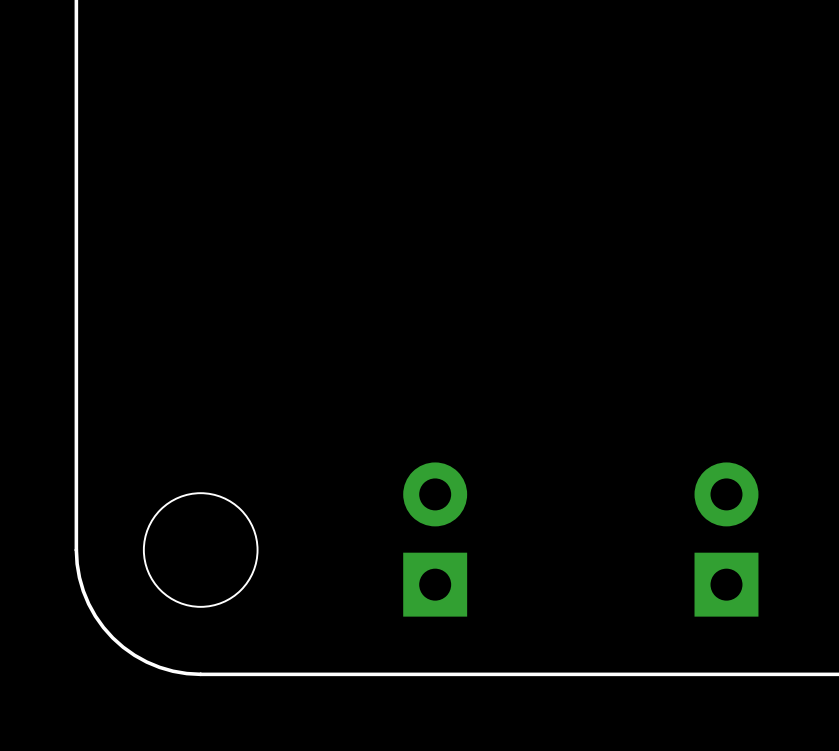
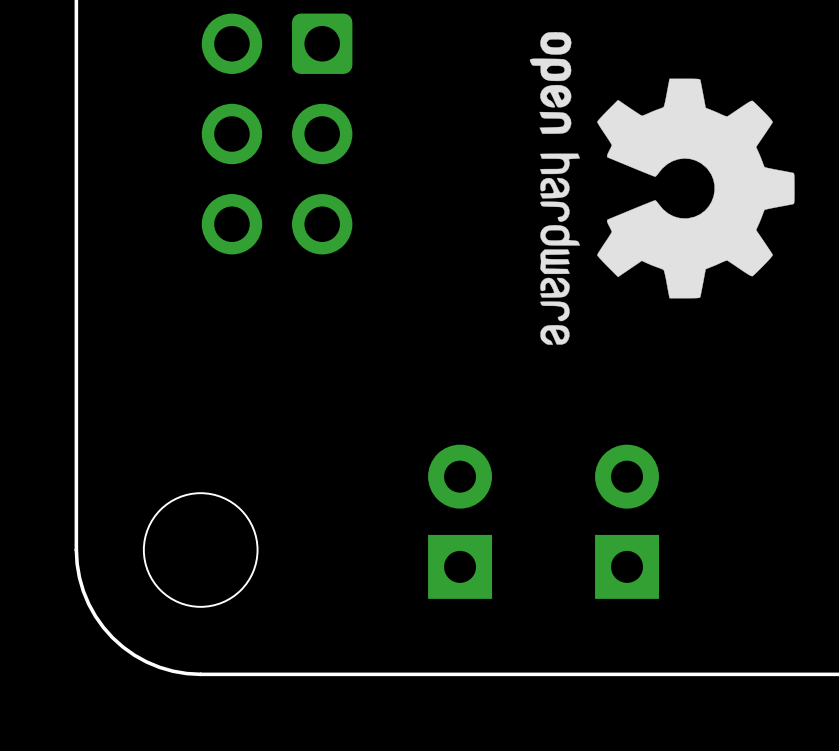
drawing: none -> [529, 32, 795, 345]
part: none -> (277, 134)
part position: (435, 539) -> (460, 521)
part position: (726, 539) -> (627, 521)

